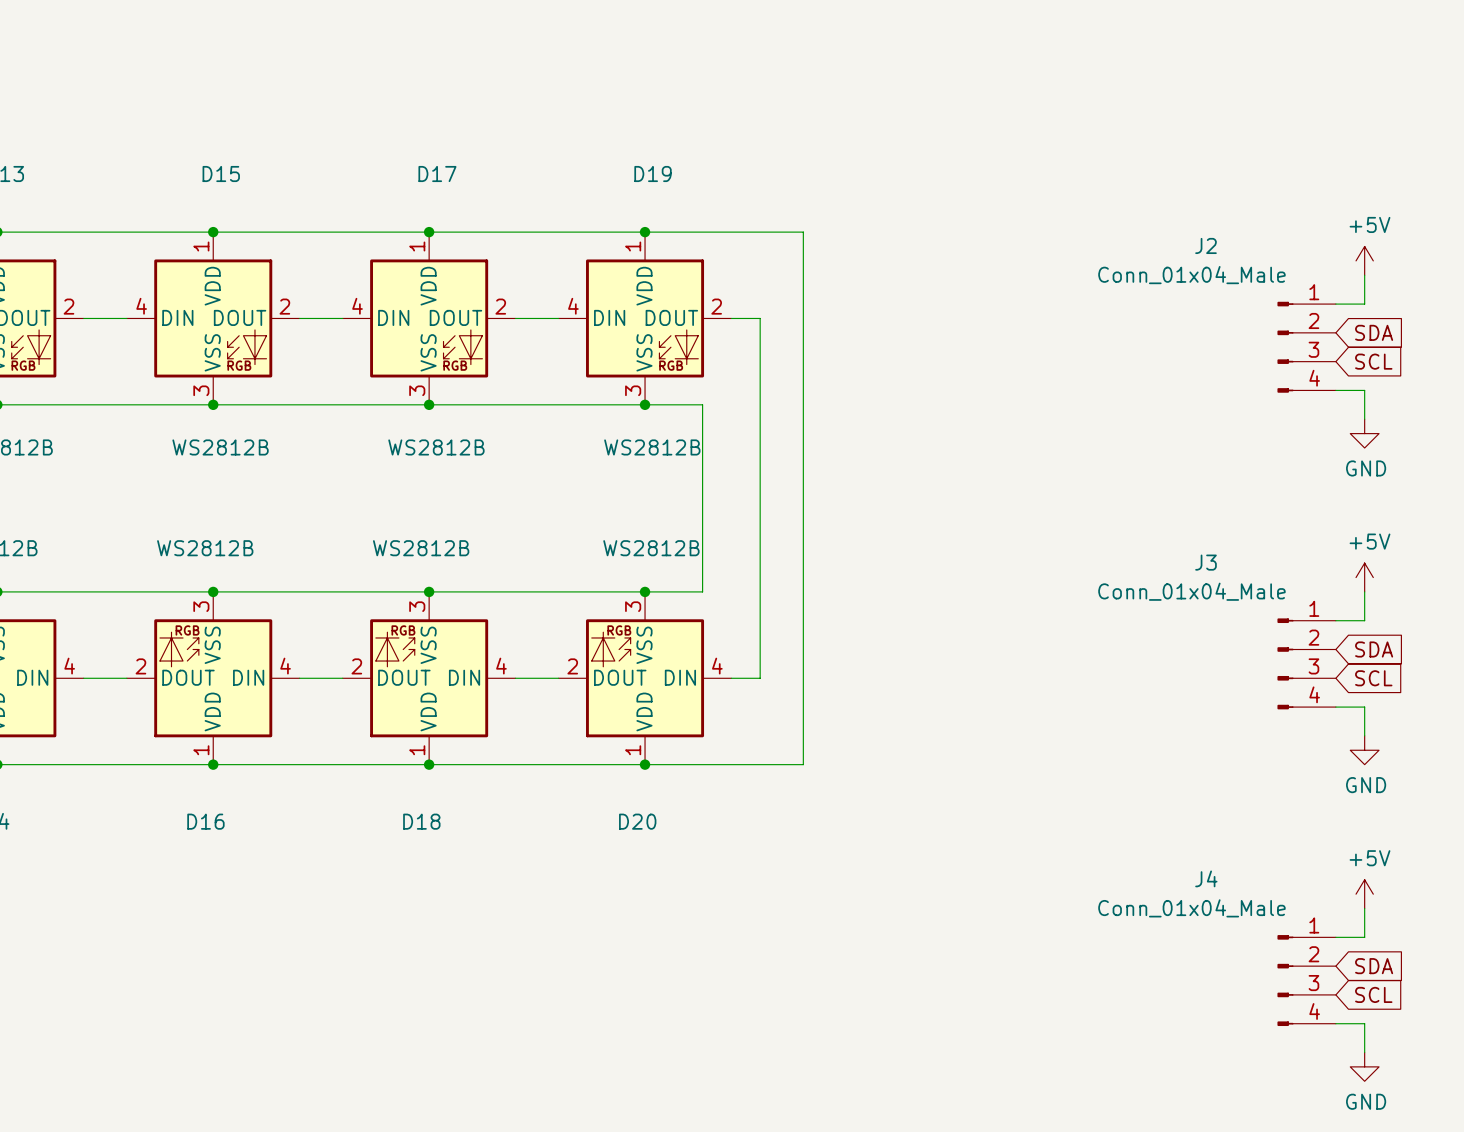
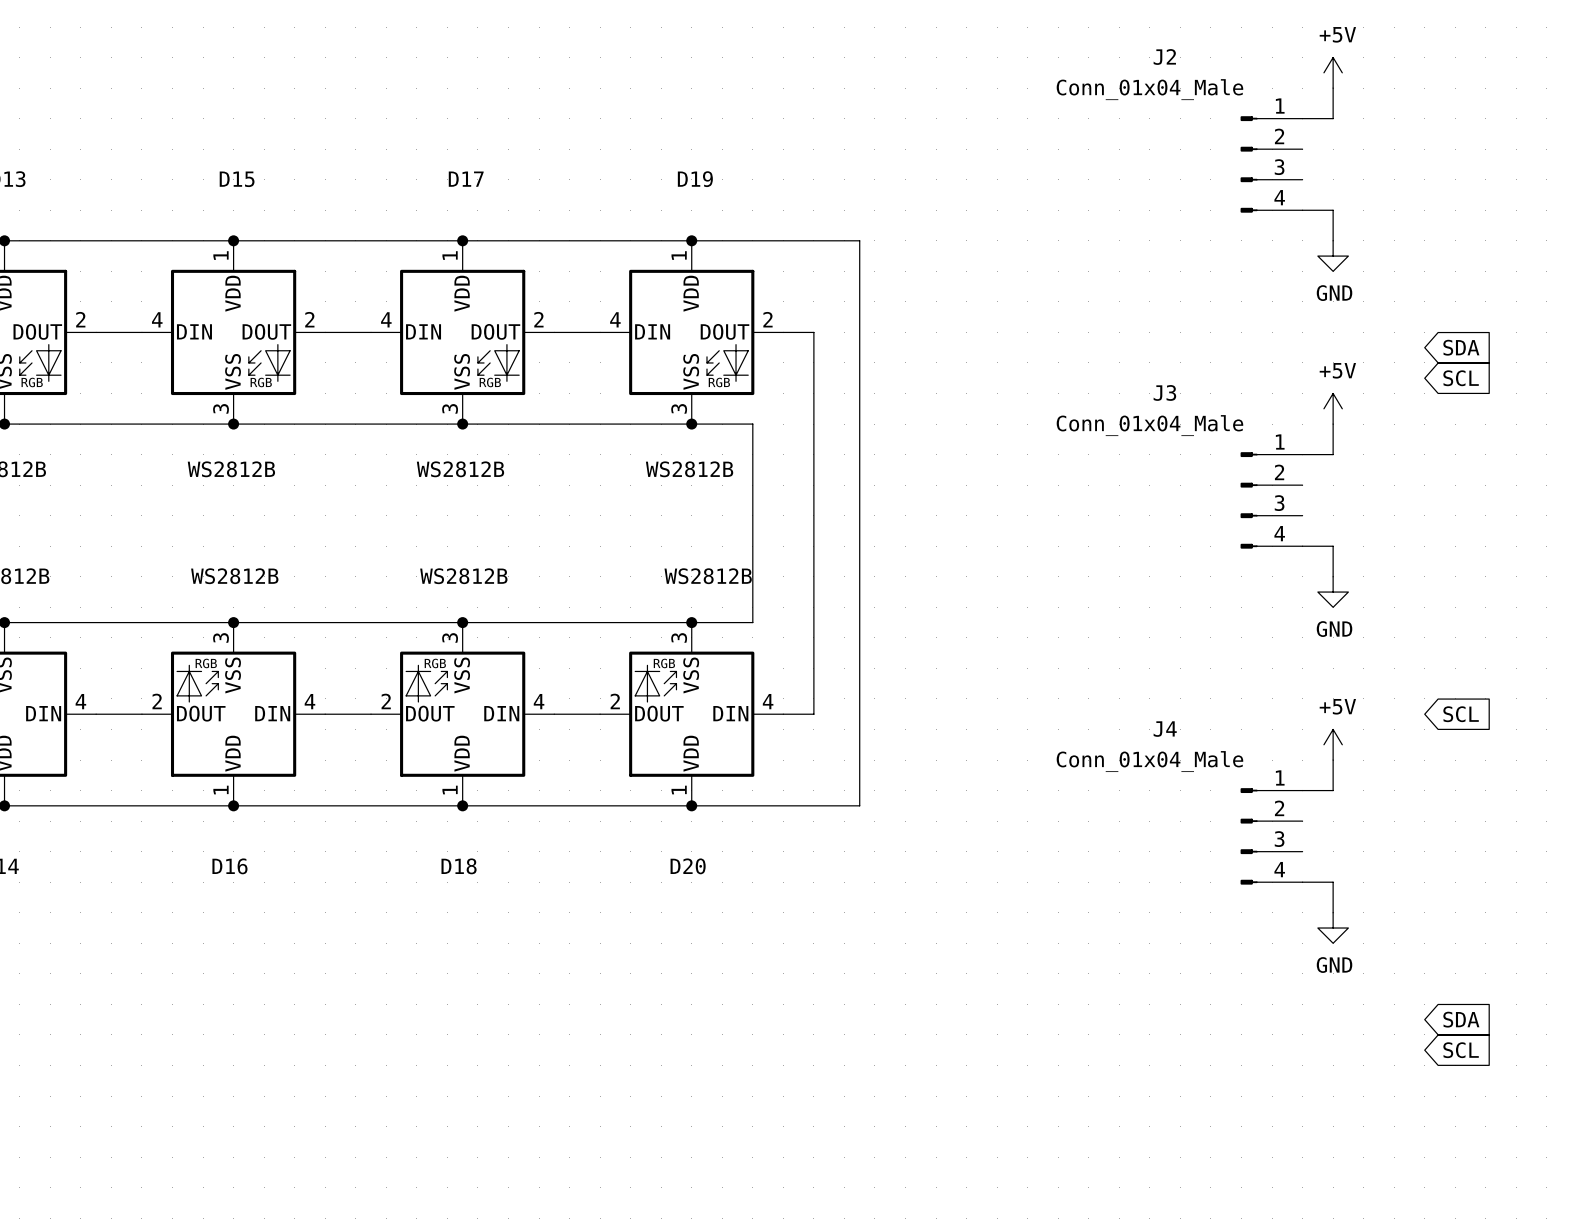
power symbol: none -> +5V (1333, 72)
power symbol: none -> GND (1333, 256)
power symbol: +5V (1364, 260) -> none
wire: (1364, 275) (1364, 304) (1335, 304) -> (1333, 88) (1333, 118) (1302, 118)
J2 position: (1306, 347) -> (1271, 164)
power symbol: none -> +5V (1333, 408)
wire: (1335, 390) (1364, 390) (1364, 419) -> (1302, 210) (1333, 210) (1333, 240)
power symbol: GND (1364, 433) -> none
power symbol: none -> GND (1333, 592)
power symbol: +5V (1364, 577) -> none
wire: (1364, 591) (1364, 620) (1335, 620) -> (1333, 424) (1333, 454) (1302, 454)
global label: SDA (1374, 649) -> none
J3 position: (1306, 663) -> (1271, 500)
power symbol: none -> +5V (1333, 744)
wire: (1335, 707) (1364, 707) (1364, 735) -> (1302, 546) (1333, 546) (1333, 576)
power symbol: GND (1364, 750) -> none
power symbol: none -> GND (1333, 928)
power symbol: +5V (1364, 894) -> none
wire: (1364, 908) (1364, 937) (1335, 937) -> (1333, 760) (1333, 790) (1302, 790)
J4 position: (1306, 980) -> (1271, 836)
wire: (1335, 1023) (1364, 1023) (1364, 1052) -> (1302, 882) (1333, 882) (1333, 912)
power symbol: GND (1364, 1066) -> none

